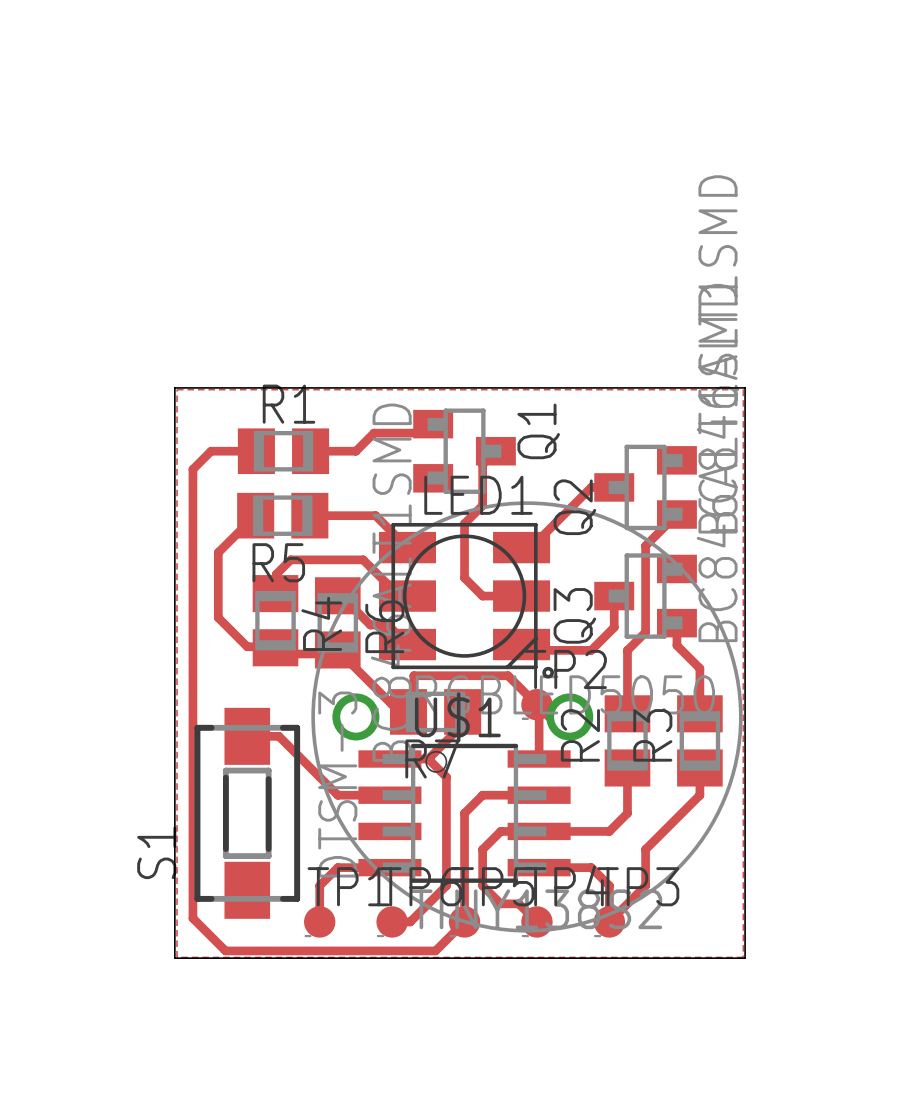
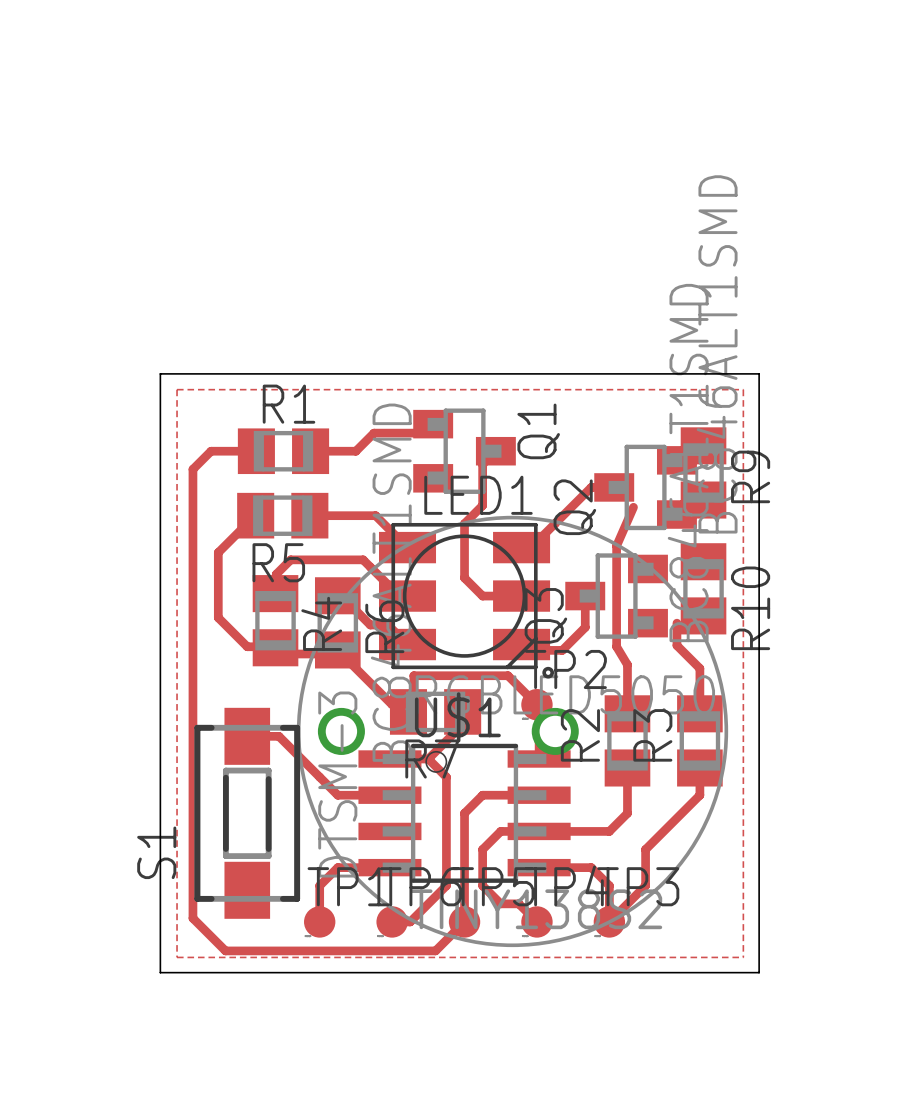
board edge: (174, 387) (745, 387) (745, 958) (174, 958) (174, 387) -> (160, 373) (160, 972) (759, 972) (759, 373) (160, 373)
R9: none -> (703, 472)
top track: (676, 514) (645, 545) (645, 632) (627, 650) (627, 664) -> (633, 507) (616, 545) (616, 646) (627, 664)
R10: none -> (703, 588)
top track: (614, 596) (614, 627) (591, 650) (562, 650) -> (585, 596) (585, 627) (562, 650)
Q3 position: (645, 596) -> (616, 596)
part position: (526, 716) -> (512, 731)

